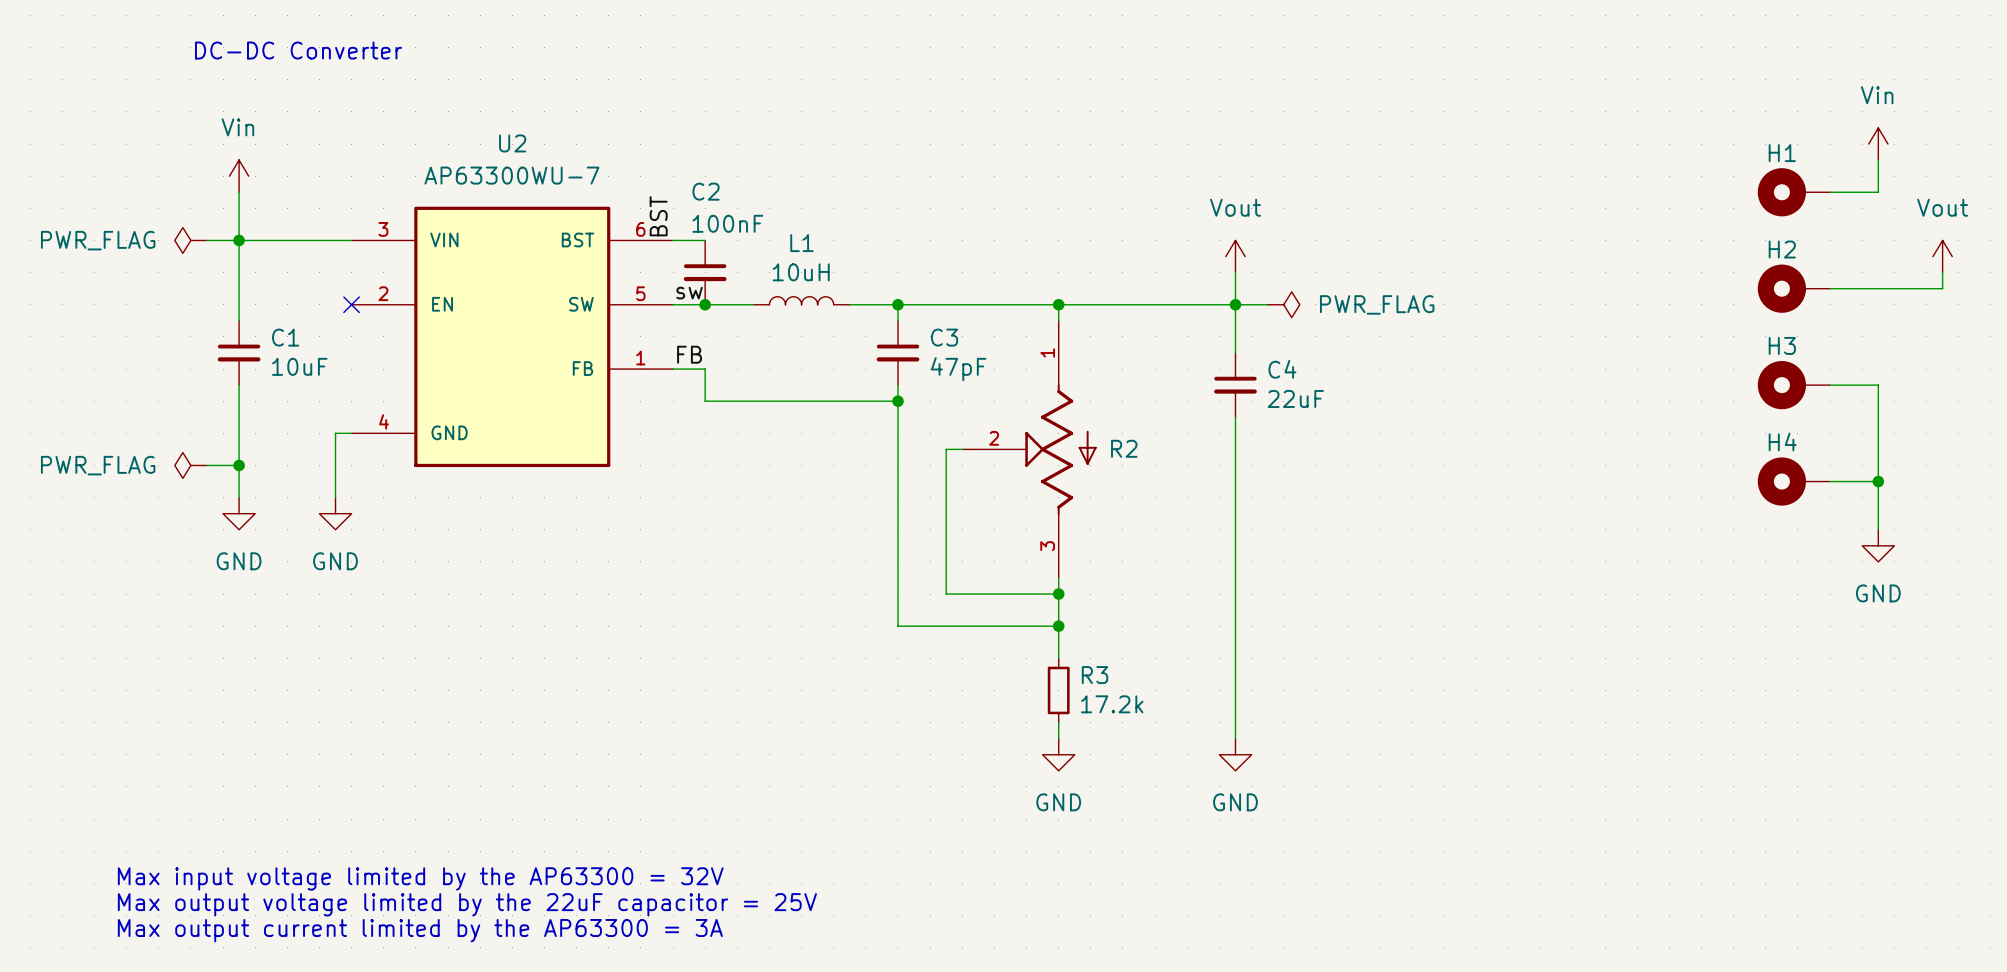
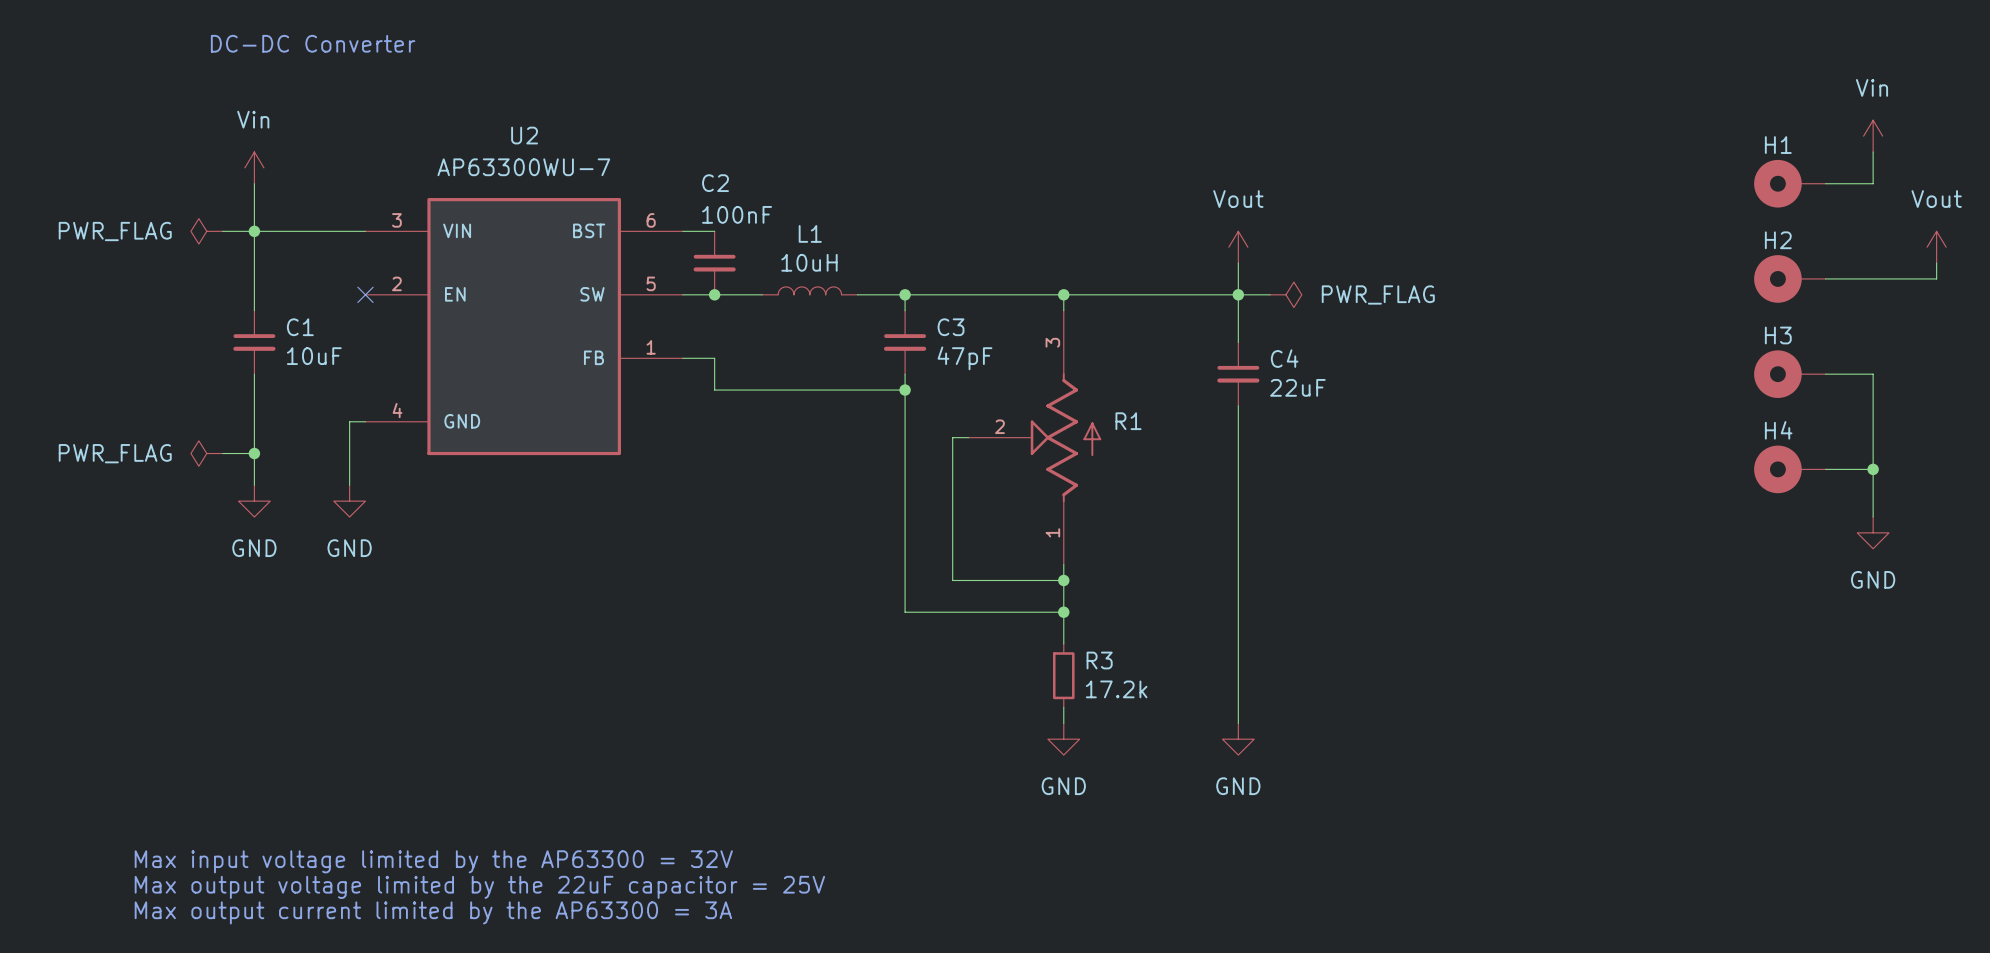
label: BST (658, 216) -> none
label: sw (689, 293) -> none
label: FB (689, 354) -> none
R2: (1029, 449) -> none
R1: none -> (1034, 437)

